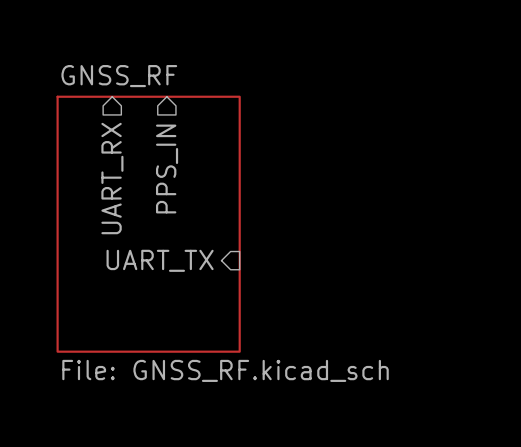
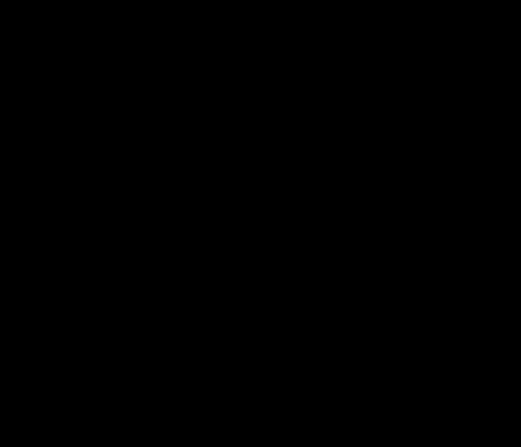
sheet pin: PPS_IN (167, 169) -> none
sheet pin: UART_RX (112, 178) -> none
sheet GNSS_RF: File: GNSS_RF.kicad_sch (148, 224) -> none
sheet pin: UART_TX (160, 260) -> none

